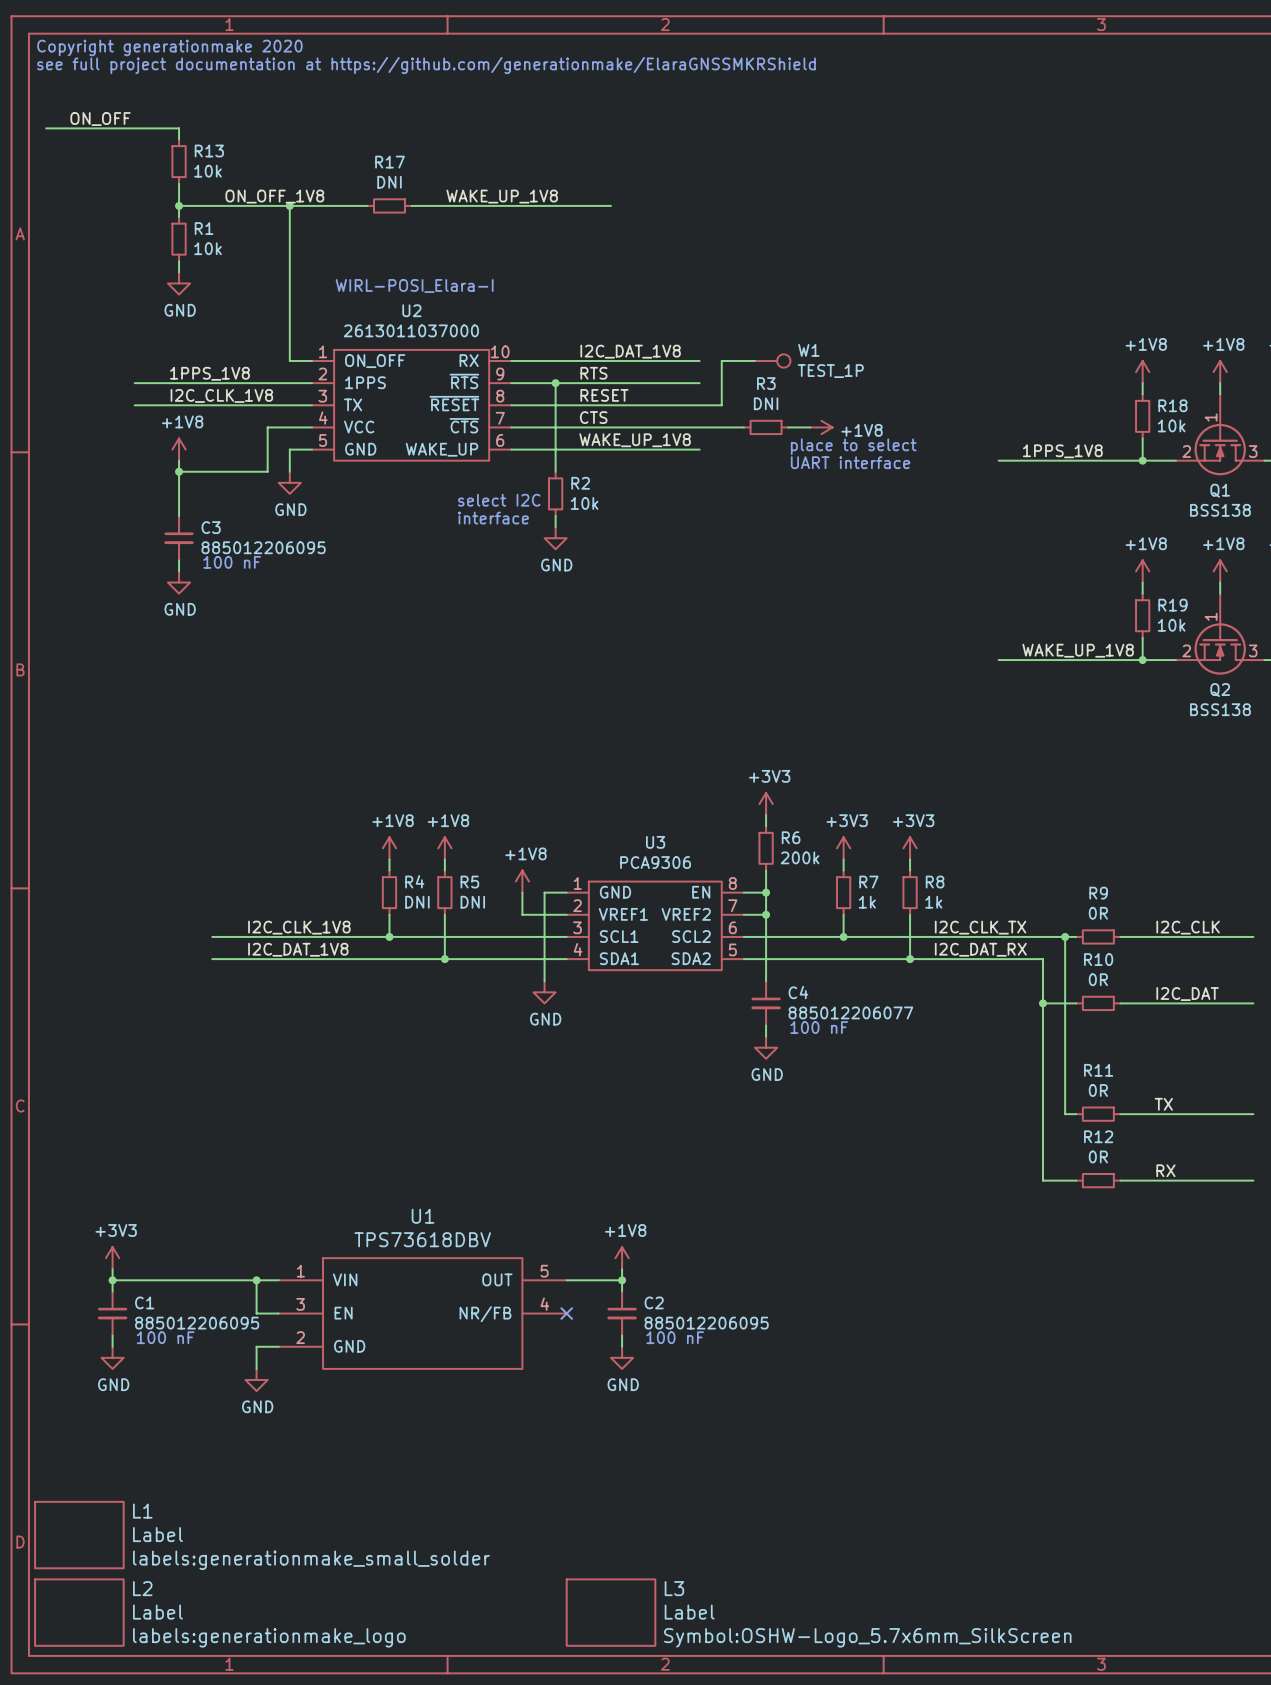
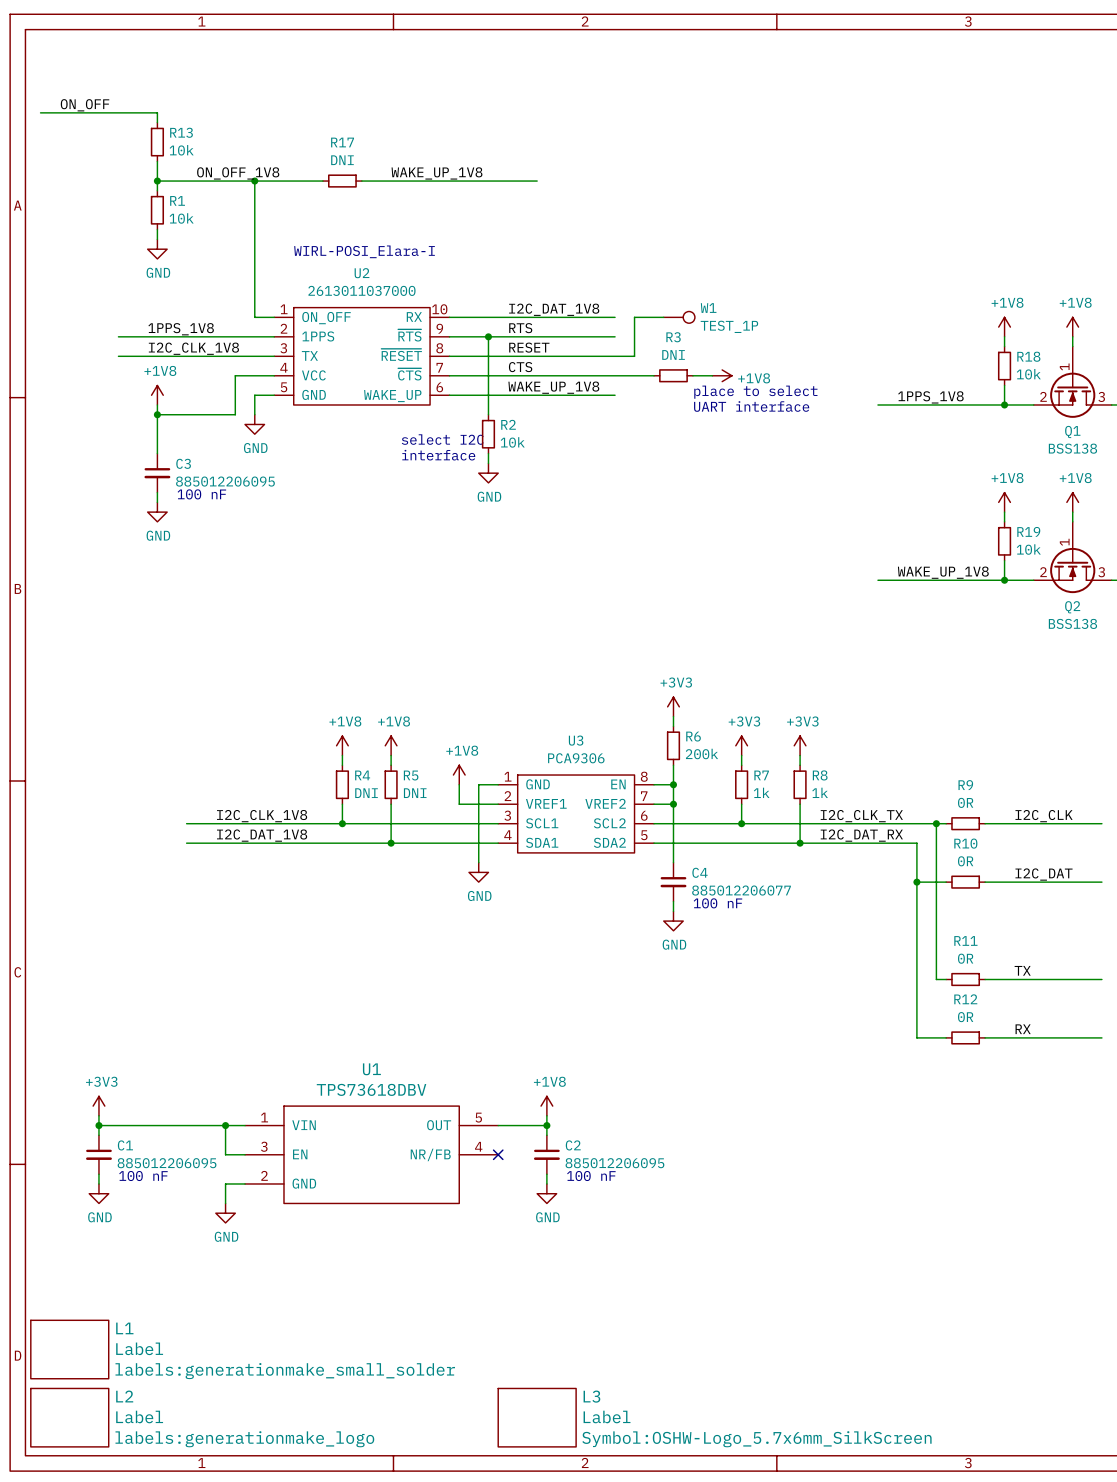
text: Copyright generationmake 2020 (169, 47) -> none
text: see full project documentation at https://github.com/generationmake/ElaraGNSSMKRShield (426, 65) -> none

